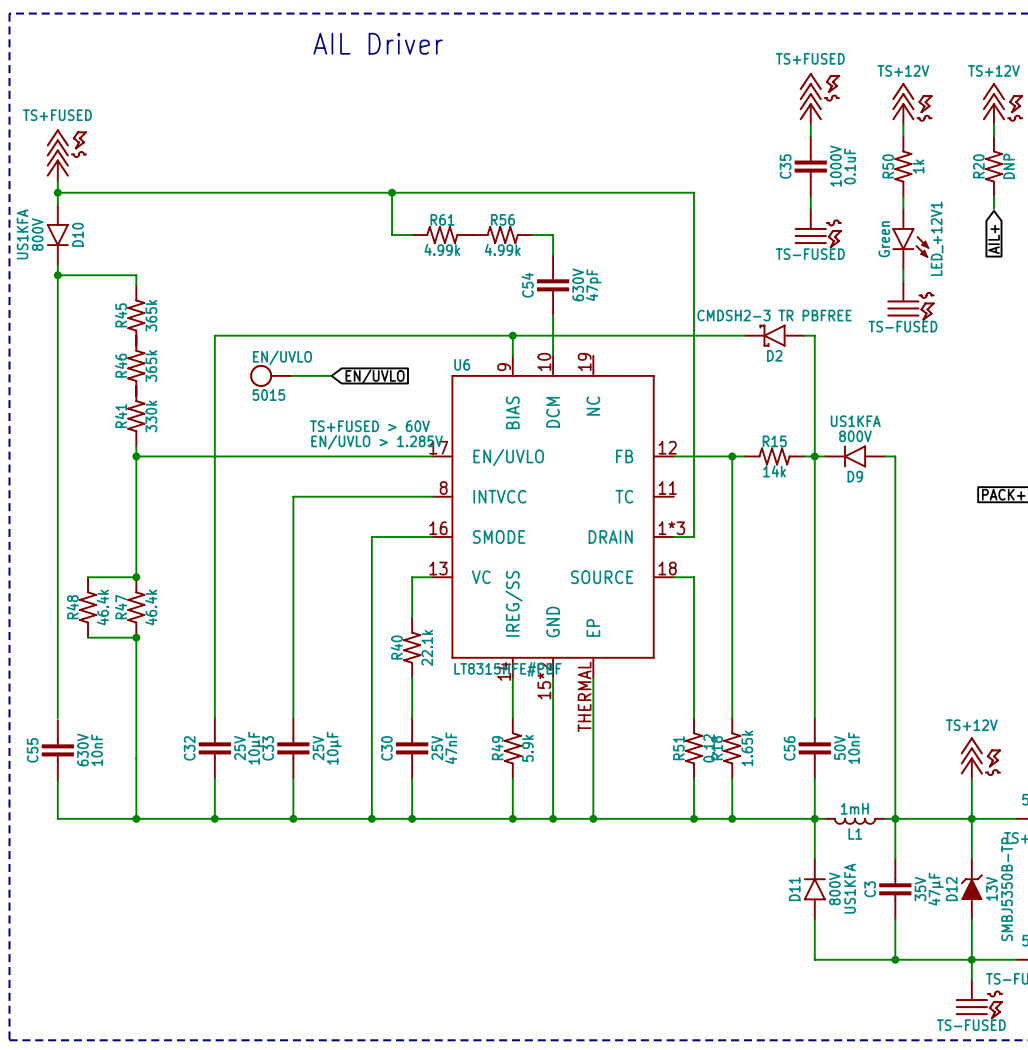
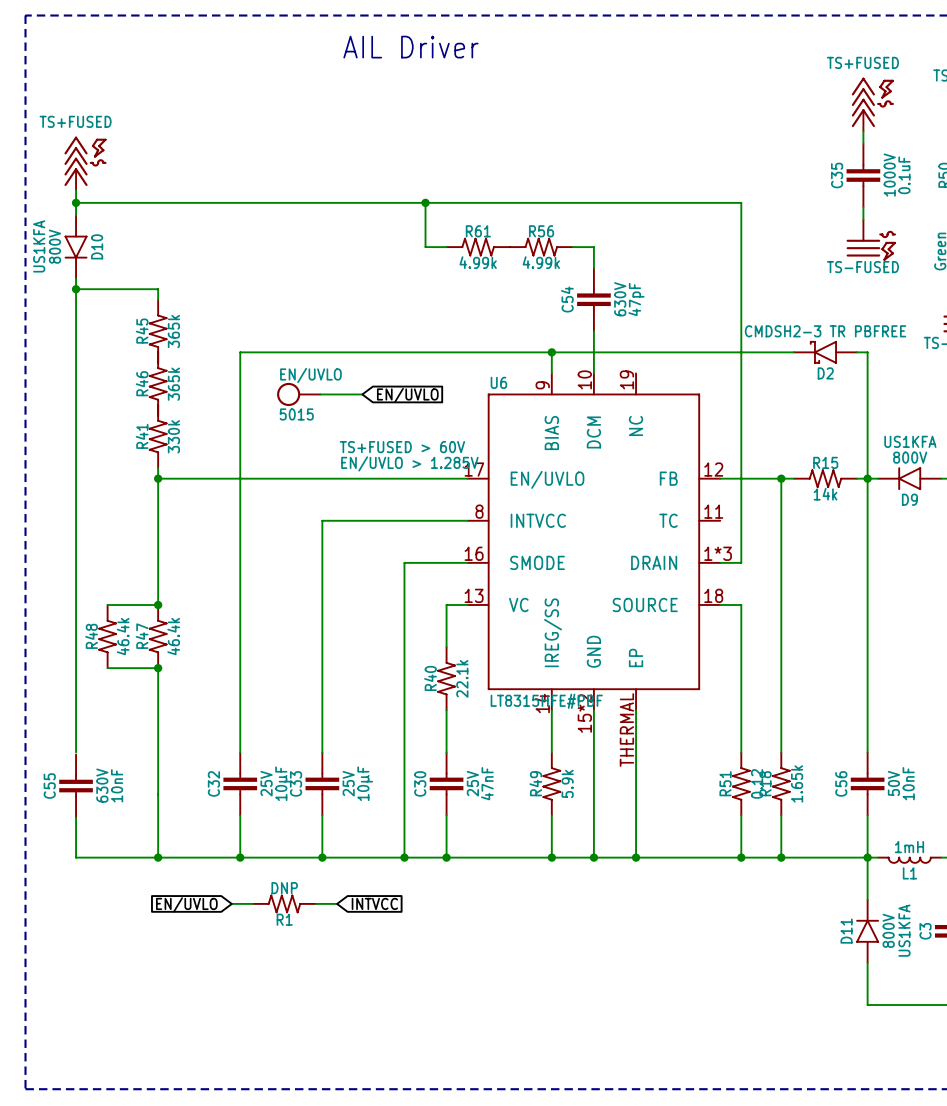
wire: none -> (231, 903) (252, 903)
R1: none -> (284, 903)
wire: none -> (316, 903) (337, 903)
global label: none -> INTVCC (374, 903)
global label: none -> EN/UVLO (186, 904)

